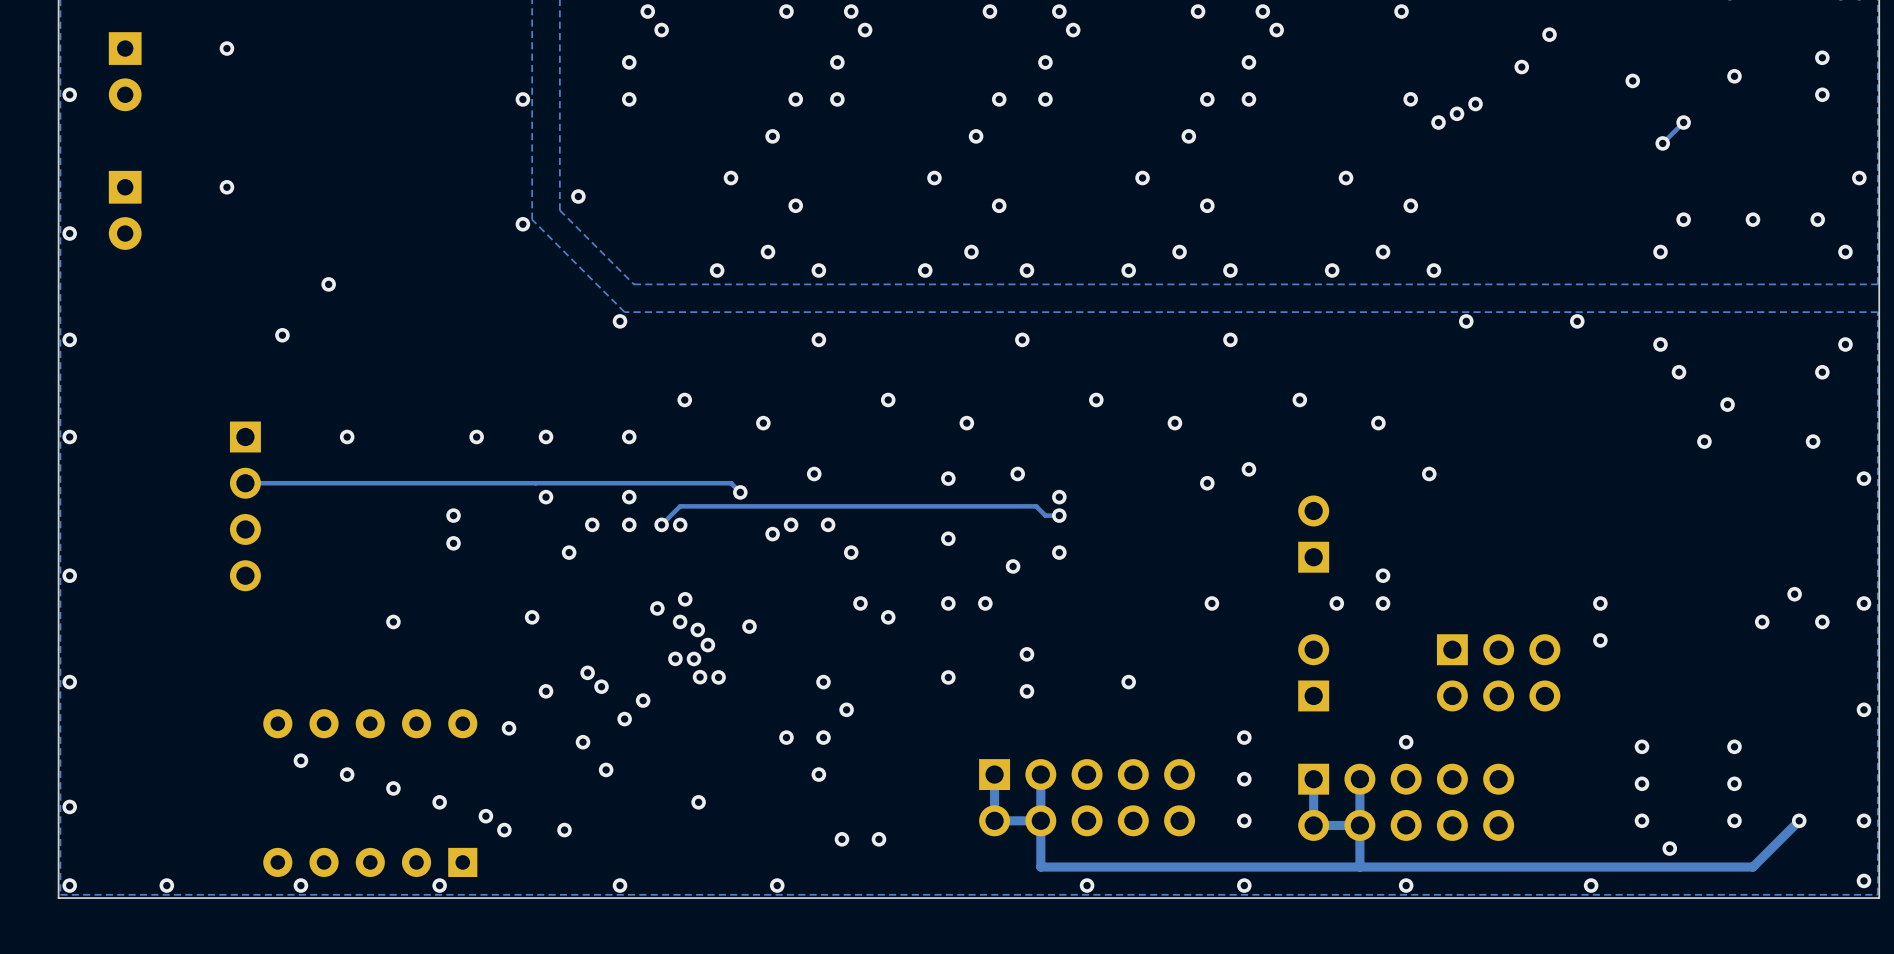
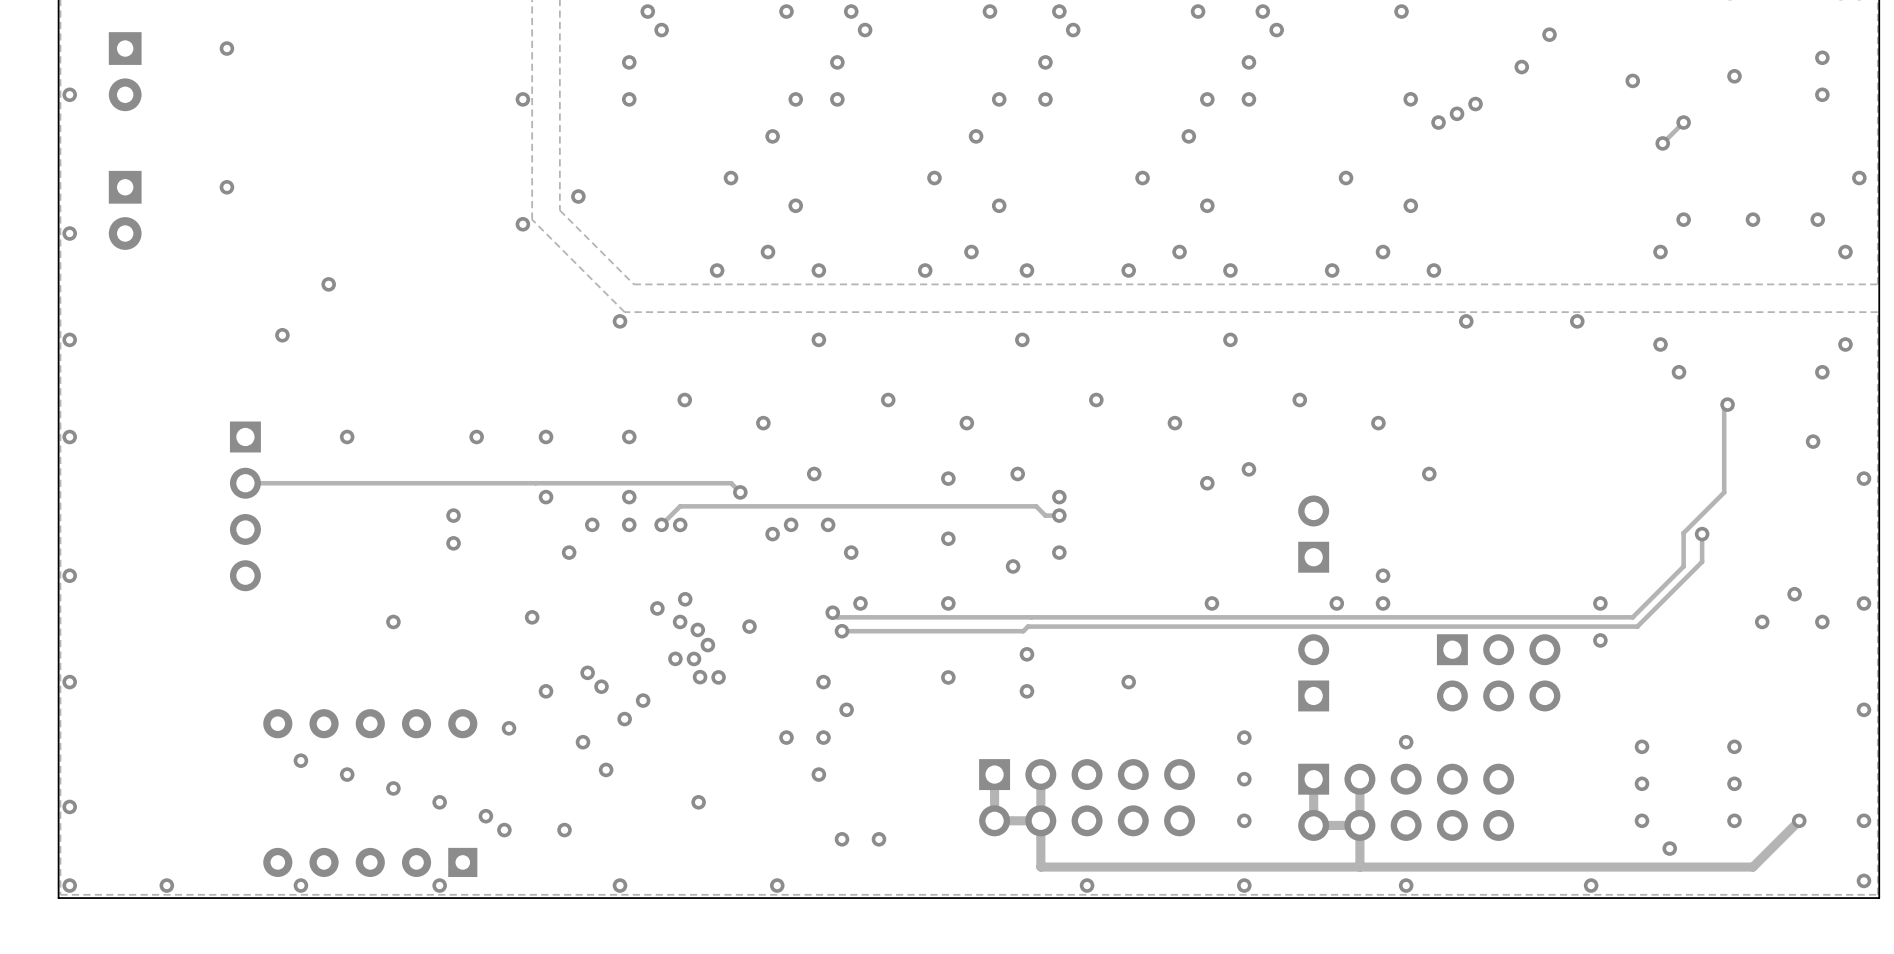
track: none -> (1725, 404) (1724, 492) (1683, 533) (1683, 566) (1632, 617) (837, 617) (832, 612)
via position: (1704, 441) -> (1702, 534)
track: none -> (1702, 534) (1702, 561) (1637, 626) (1027, 626) (1023, 631) (841, 631)
via: (985, 603) -> none
via: none -> (832, 612)
via: (888, 617) -> none
via: none -> (841, 631)

